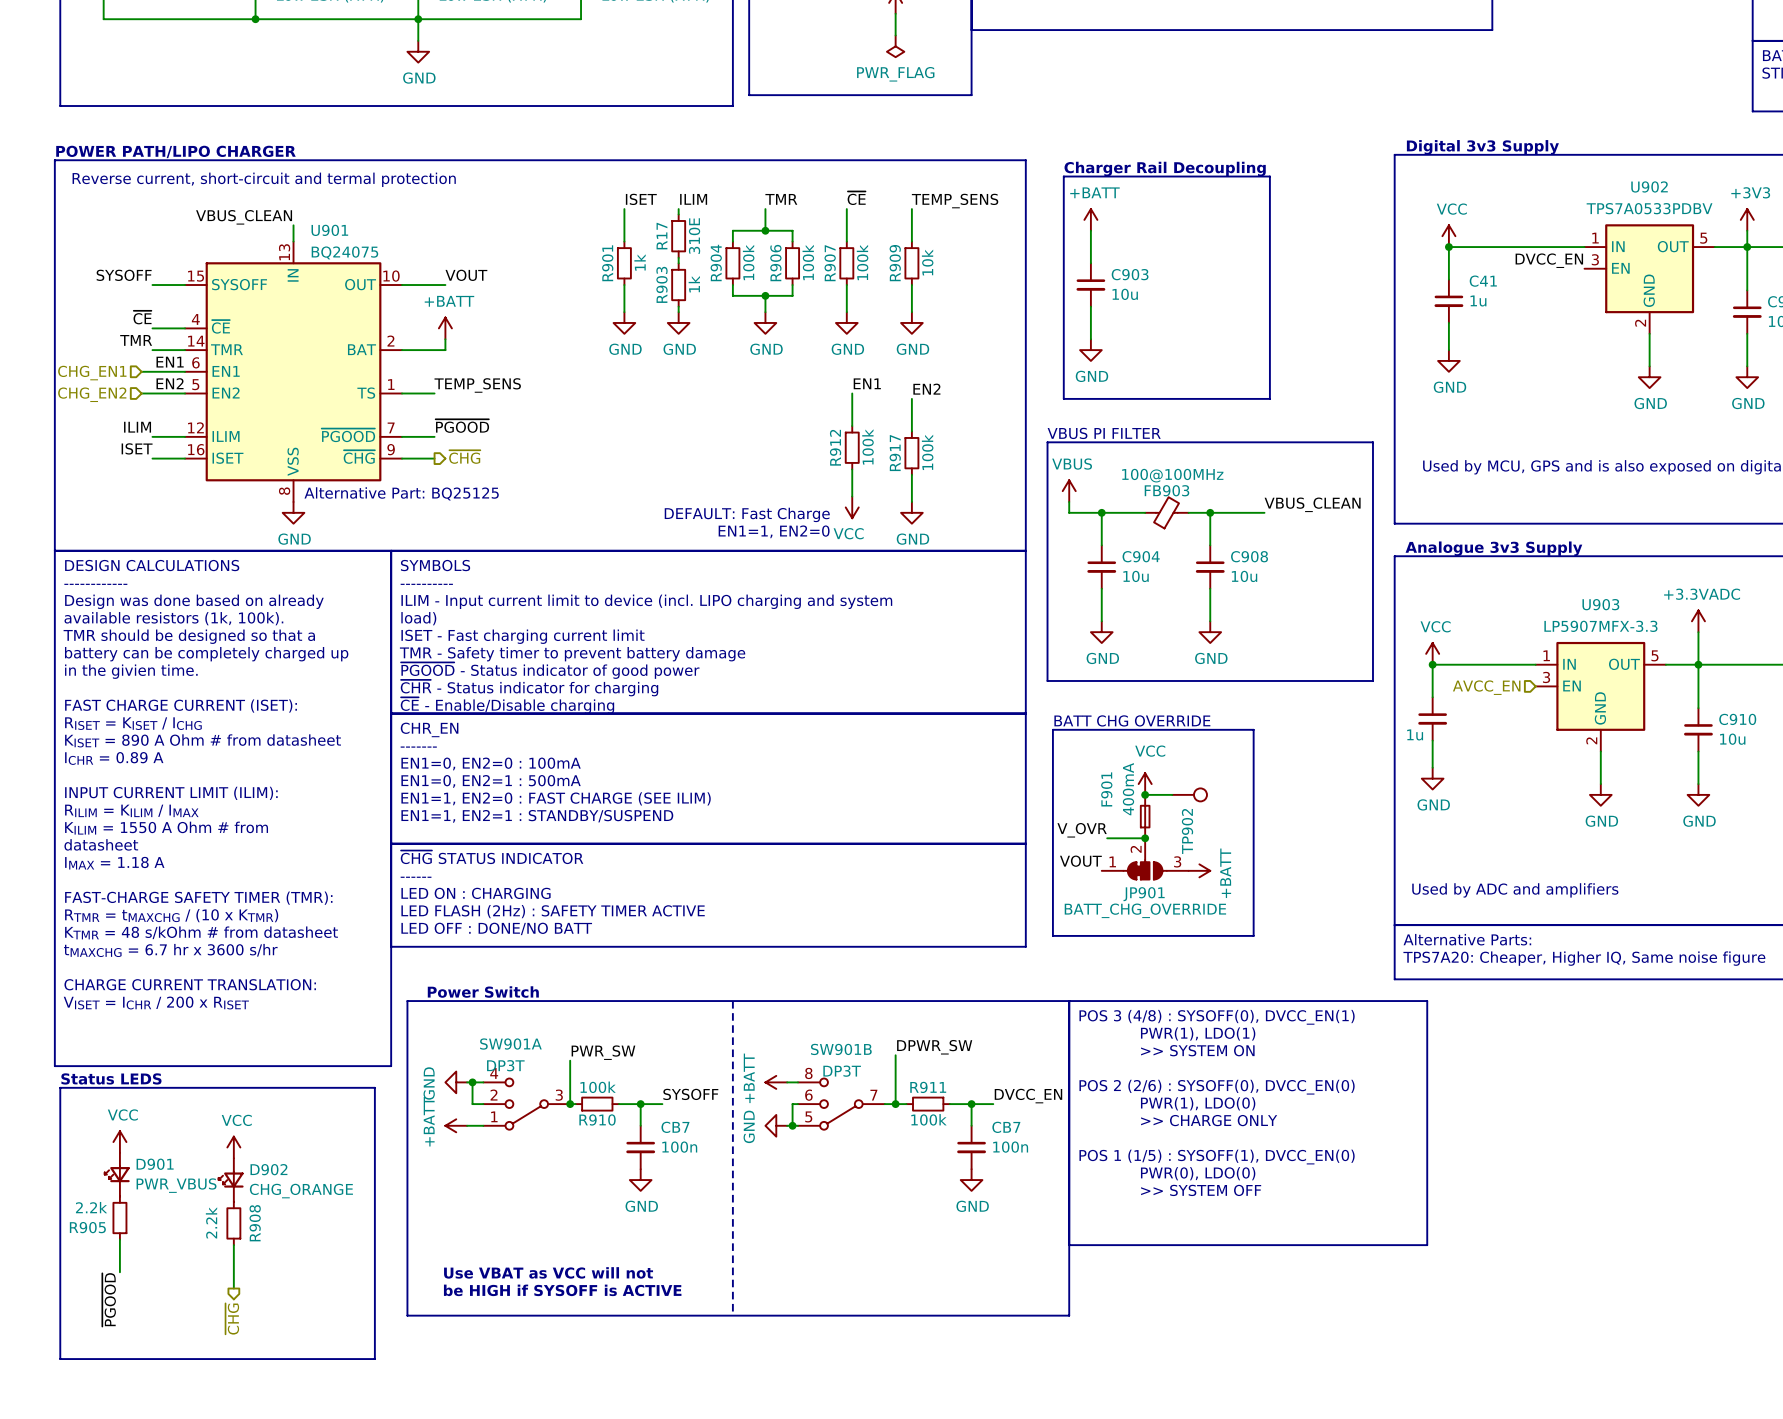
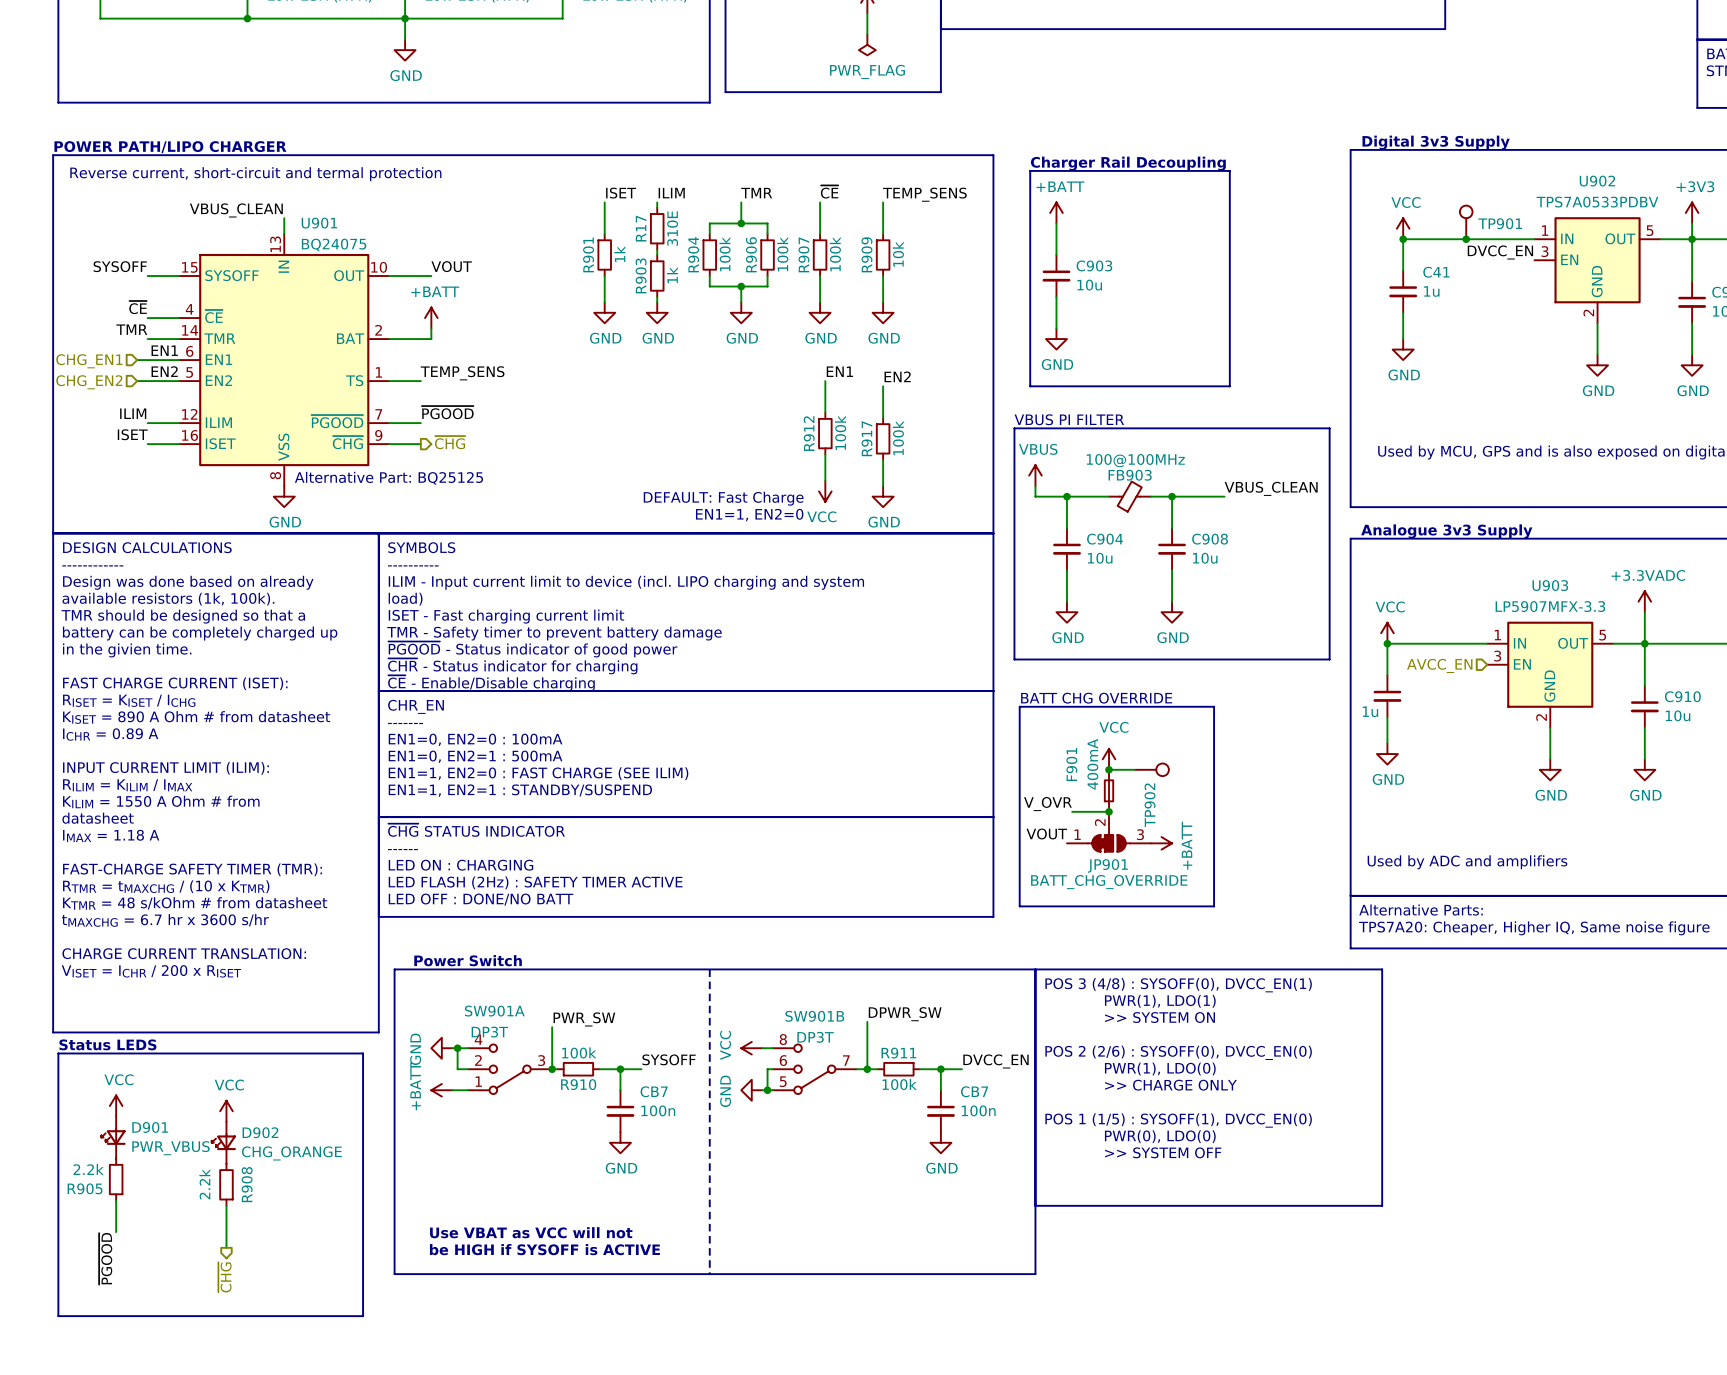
TP901: none -> (1466, 222)
junction: none -> (1466, 239)
power symbol: +BATT (776, 1082) -> VCC (751, 1048)

